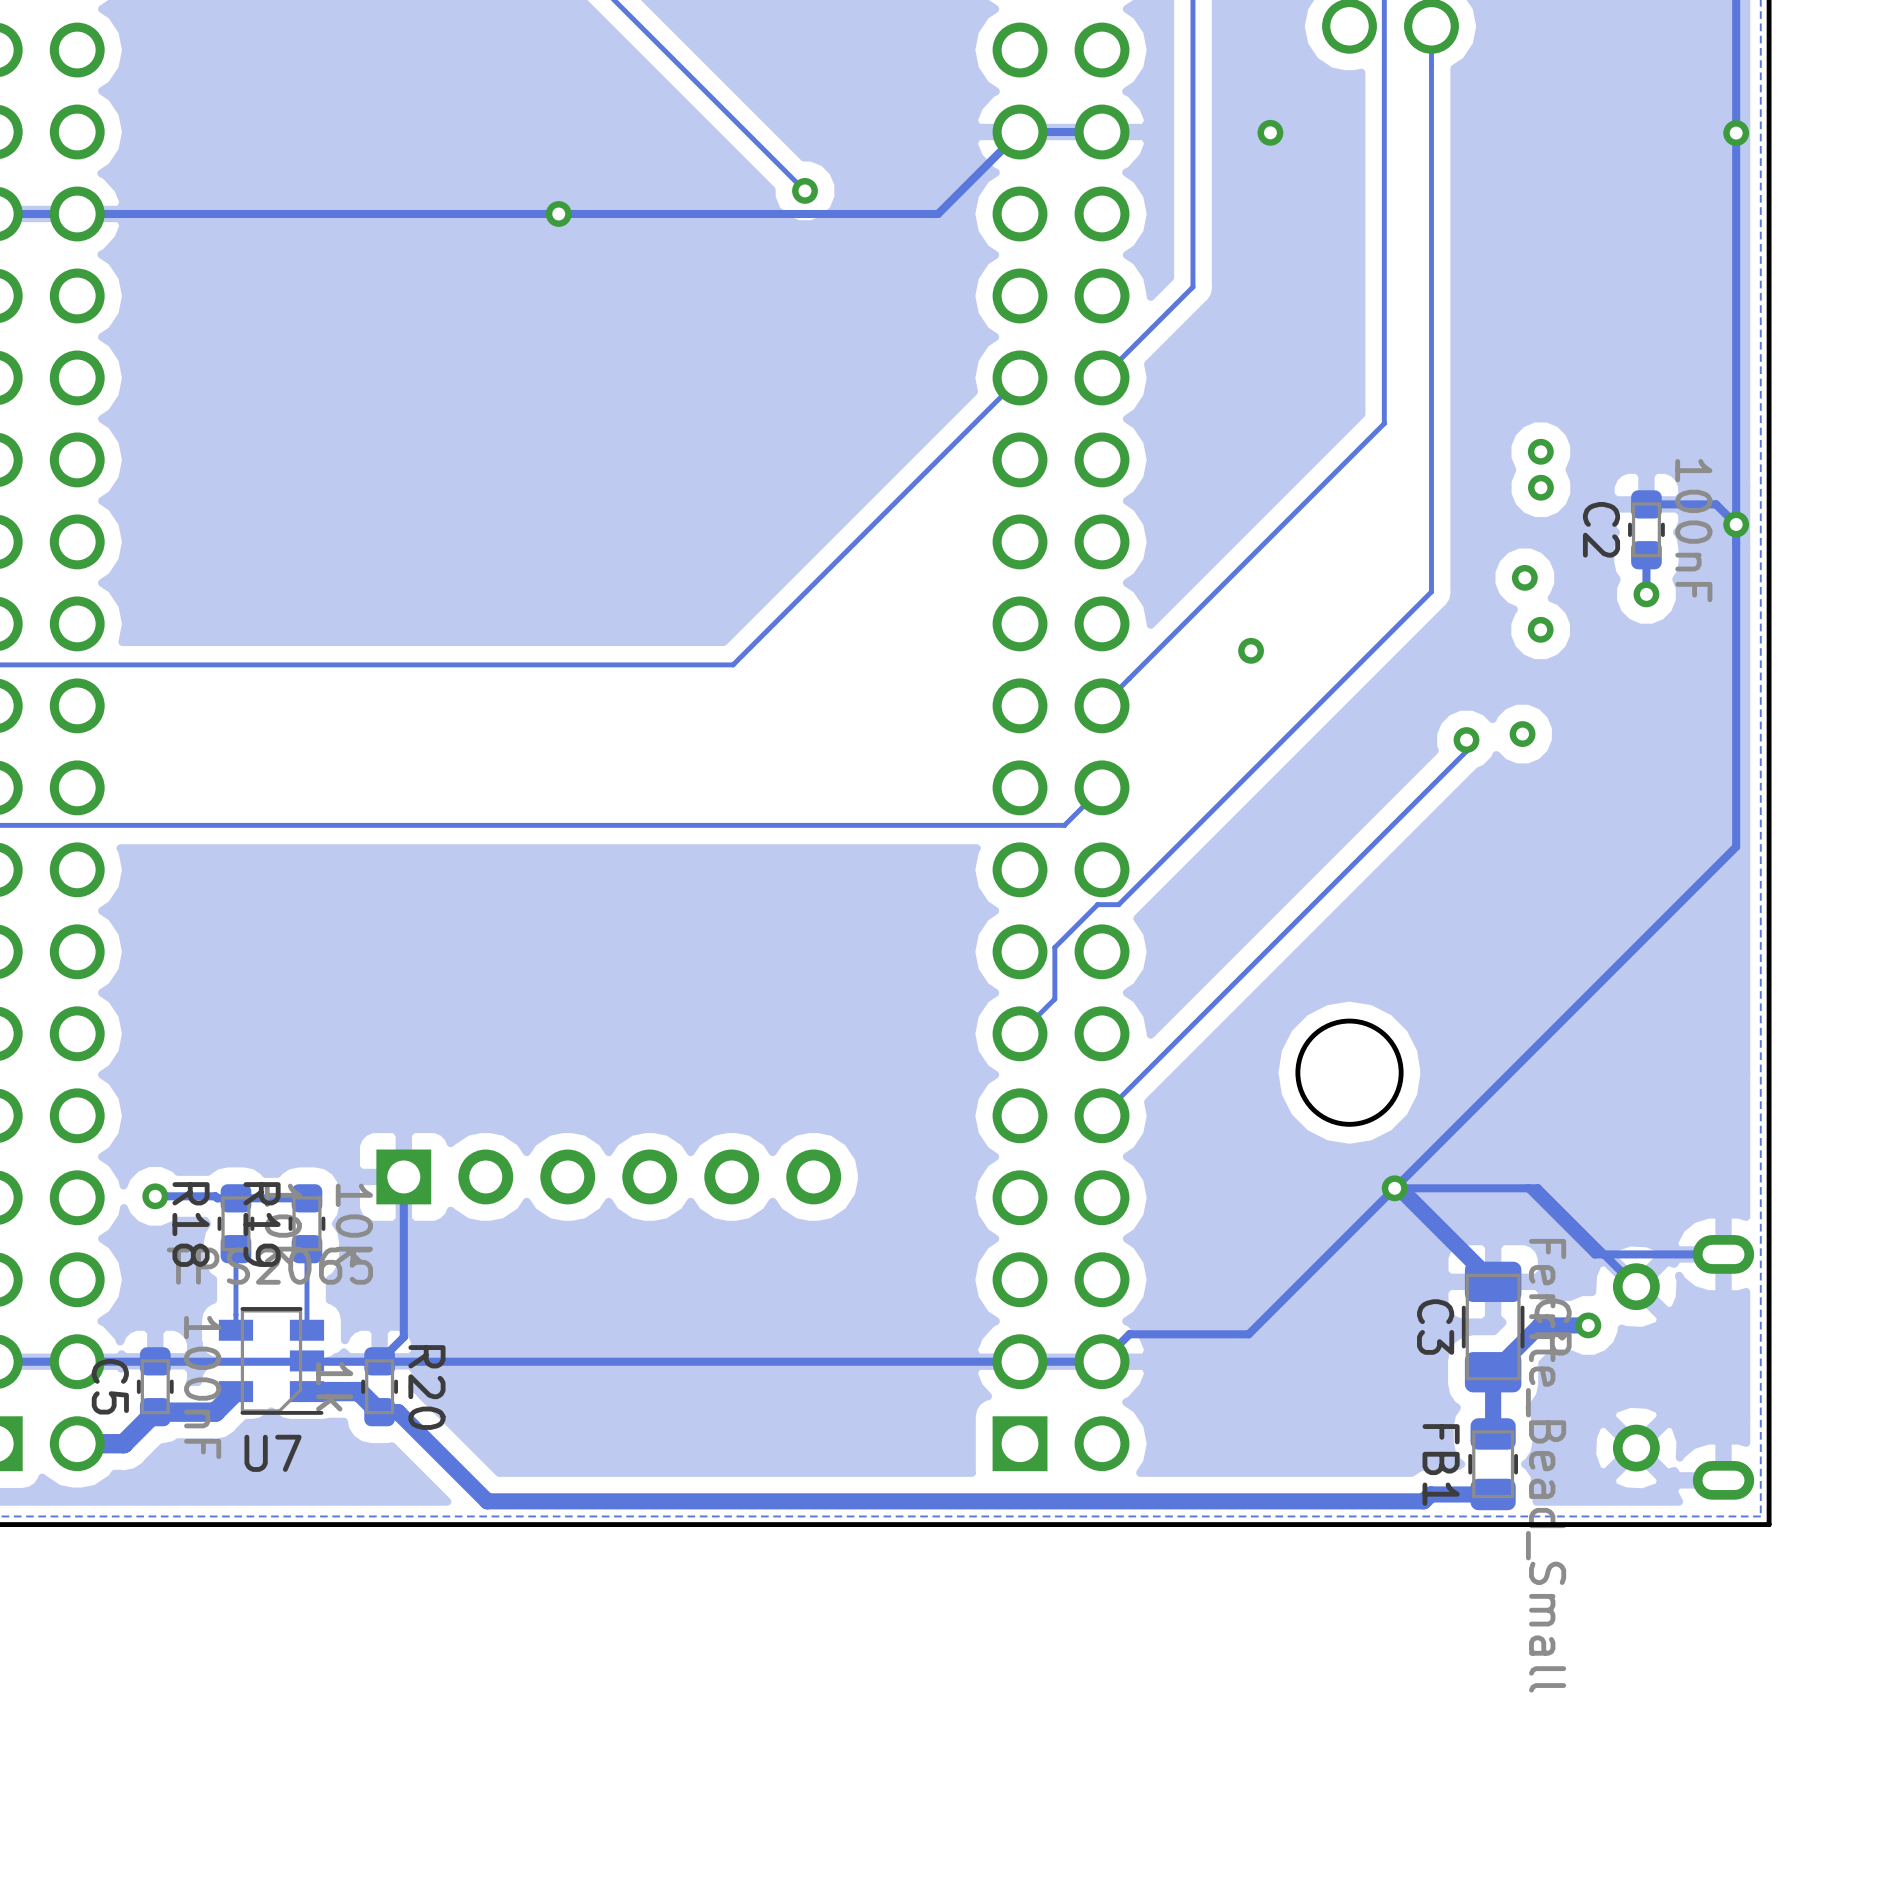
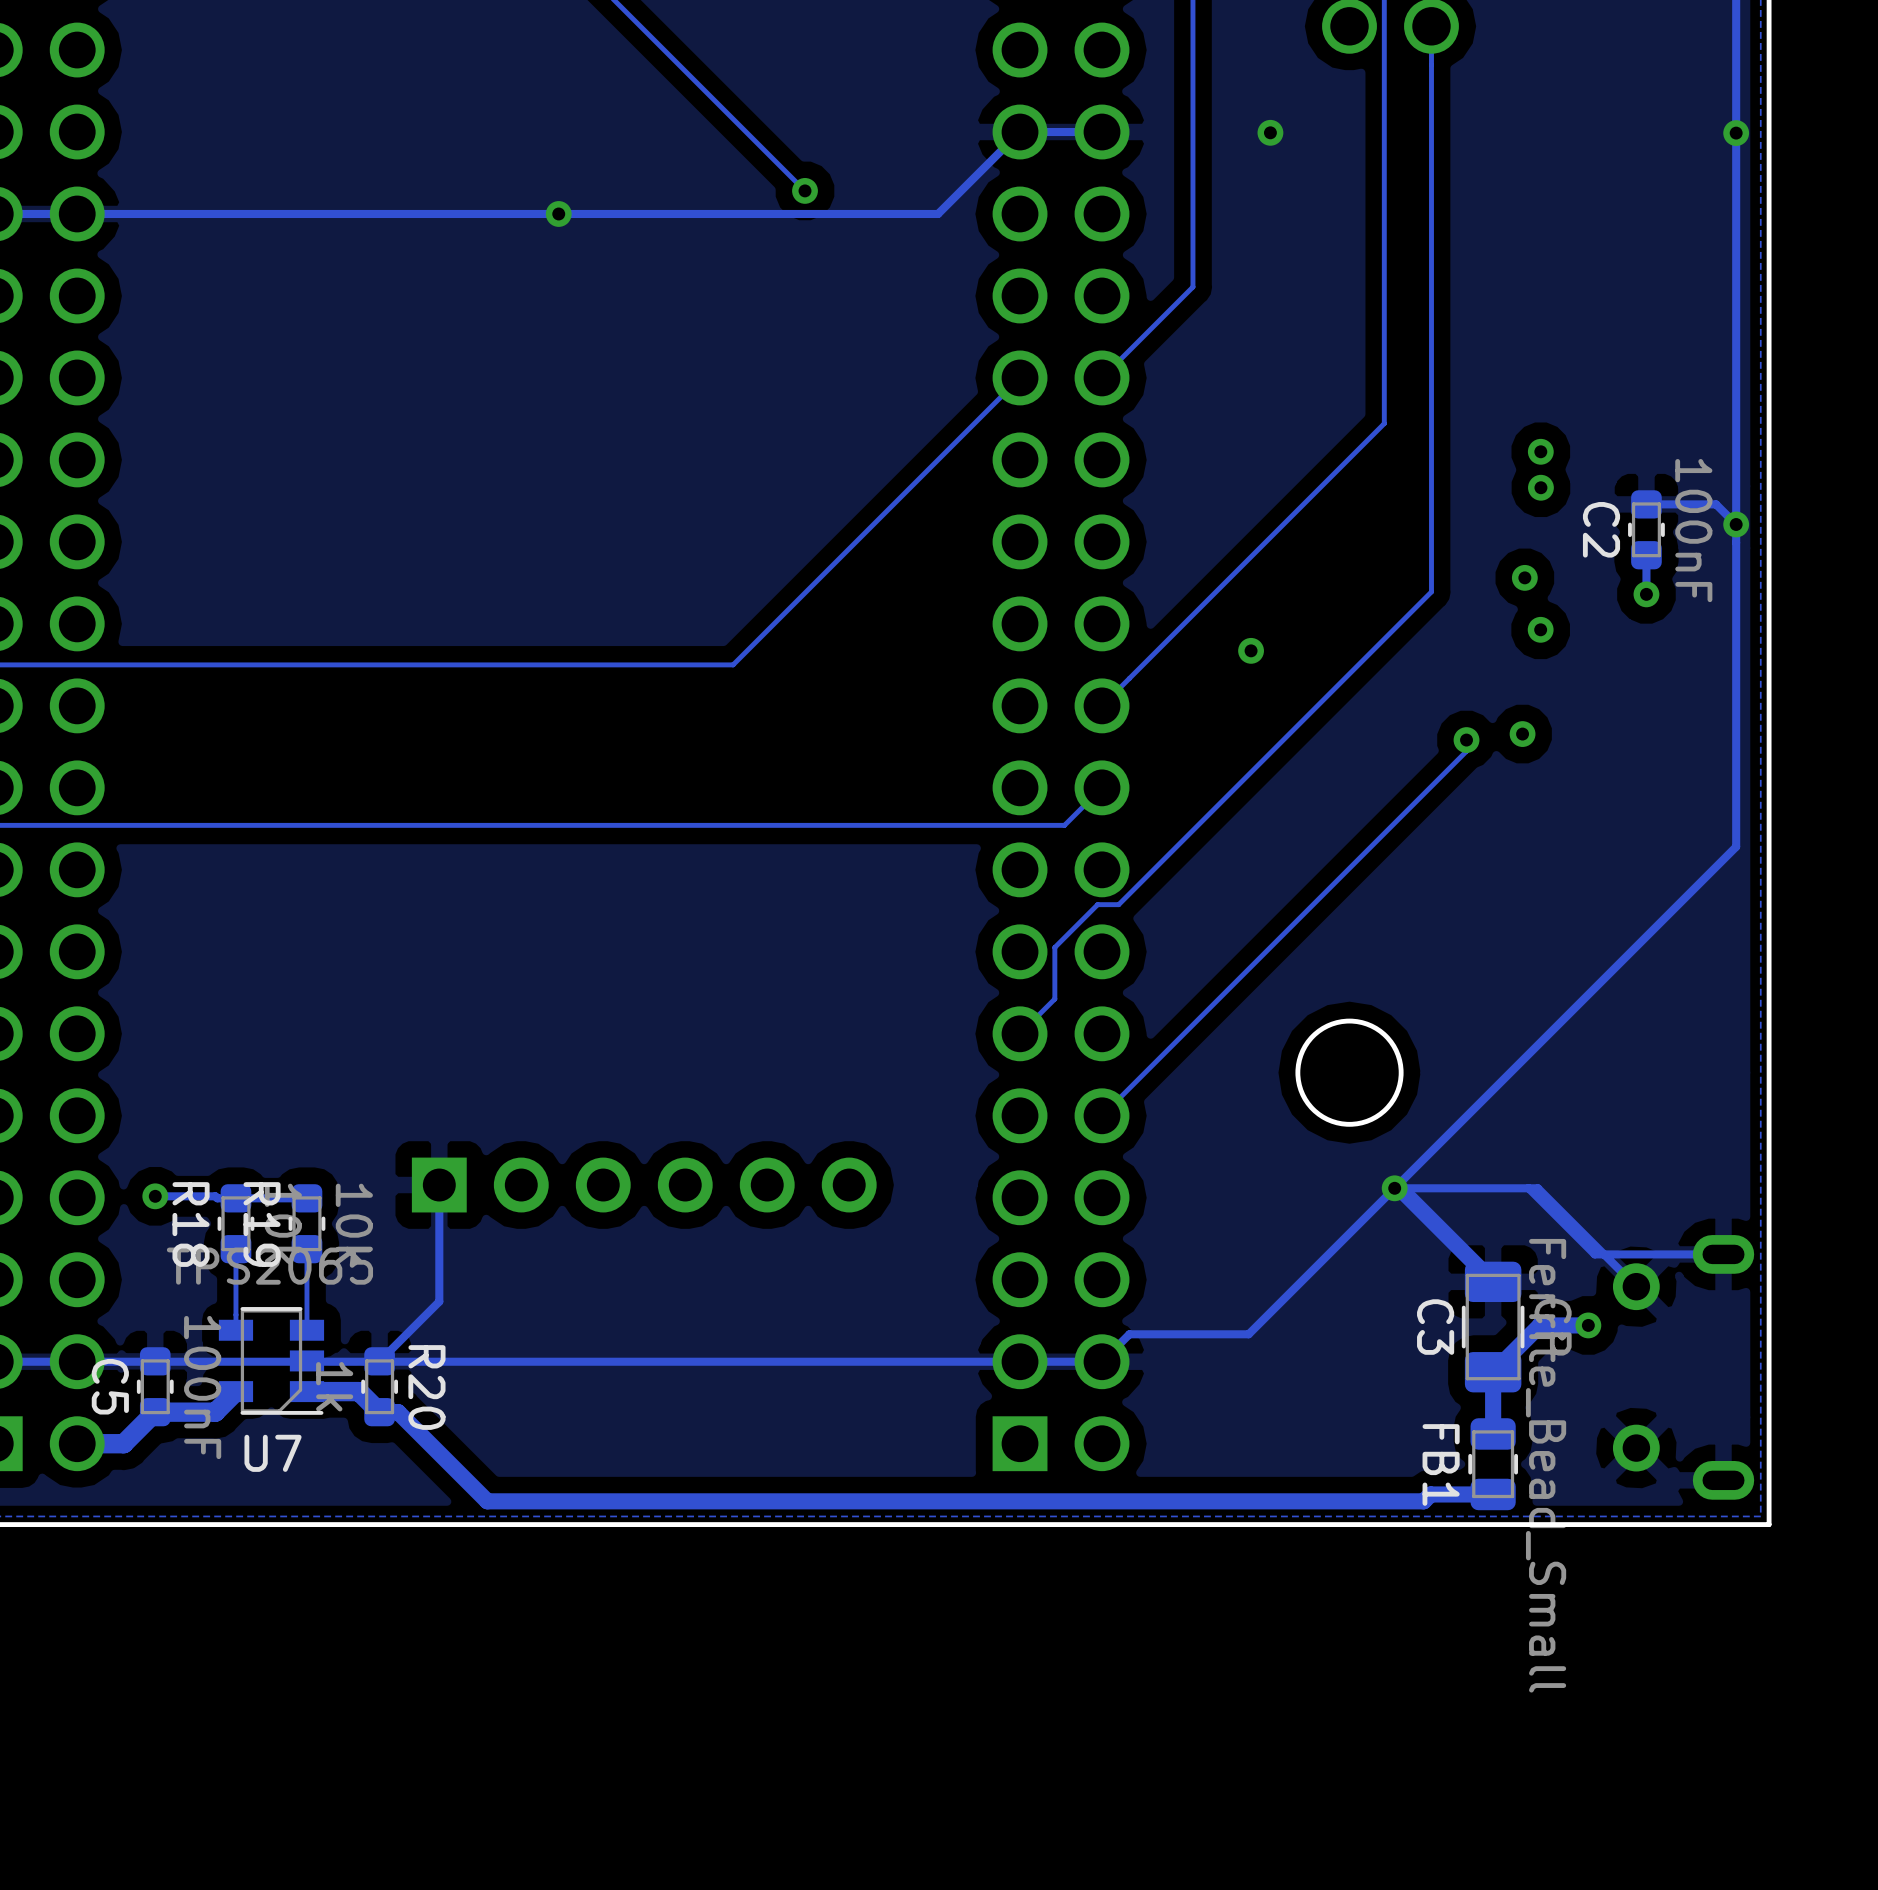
track: (403, 1176) (403, 1337) -> (439, 1185) (439, 1301) (403, 1337)
part position: (608, 1176) -> (644, 1185)

